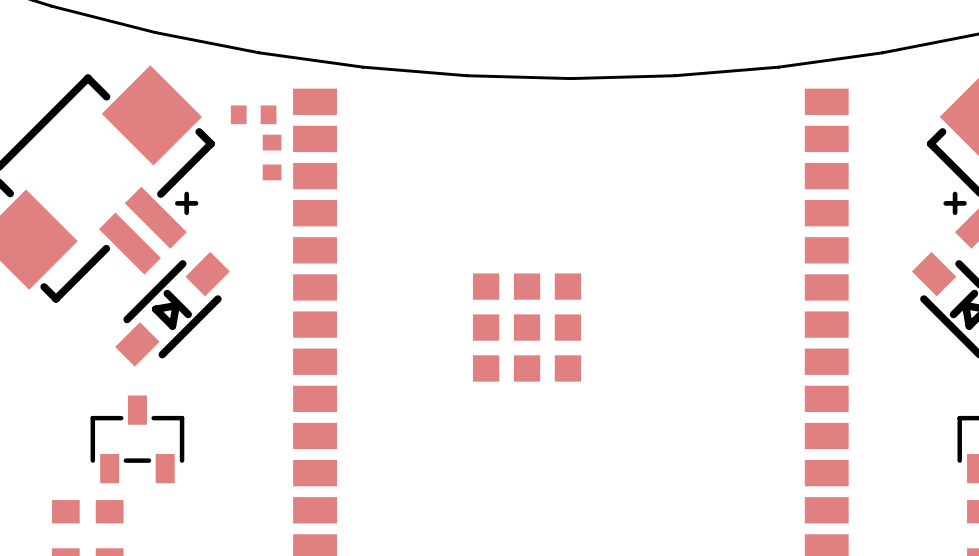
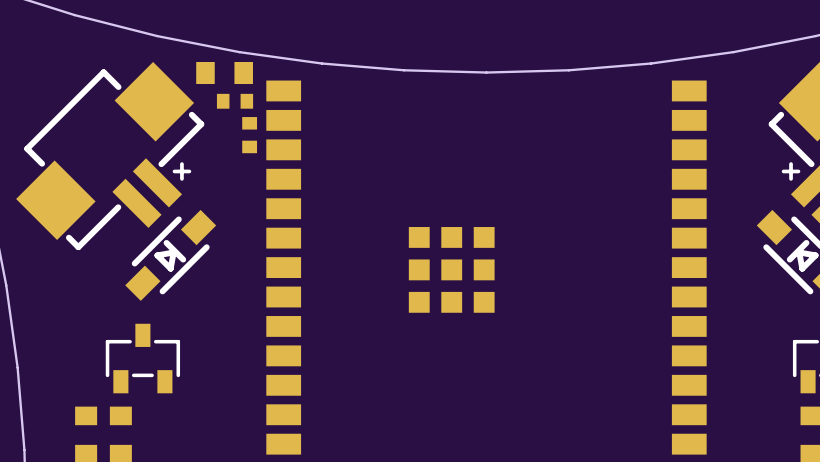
part: none -> (224, 73)

